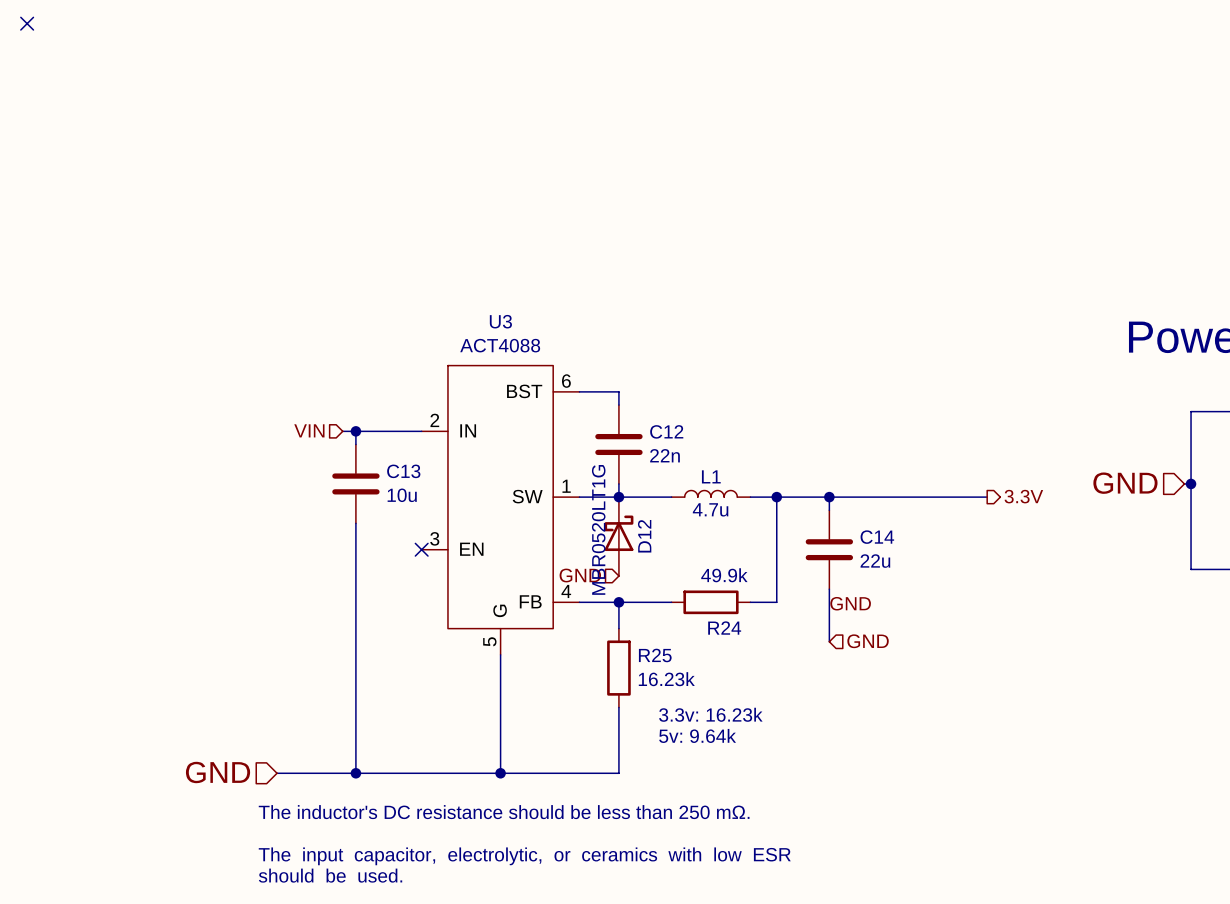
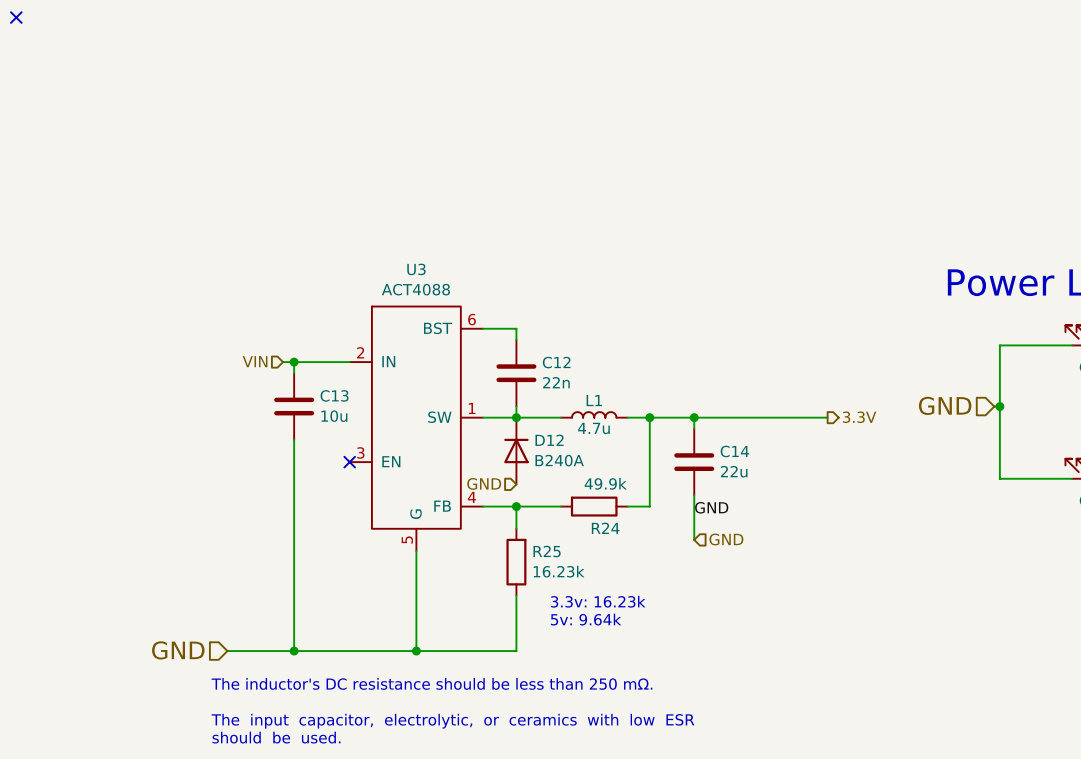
D12 symbol: [604, 497, 634, 577] -> [504, 417, 529, 485]
D12 value: MBR0520LT1G (598, 529) -> B240A (559, 460)
D12 name rotation: 0° (644, 536) -> 90° clockwise (549, 440)

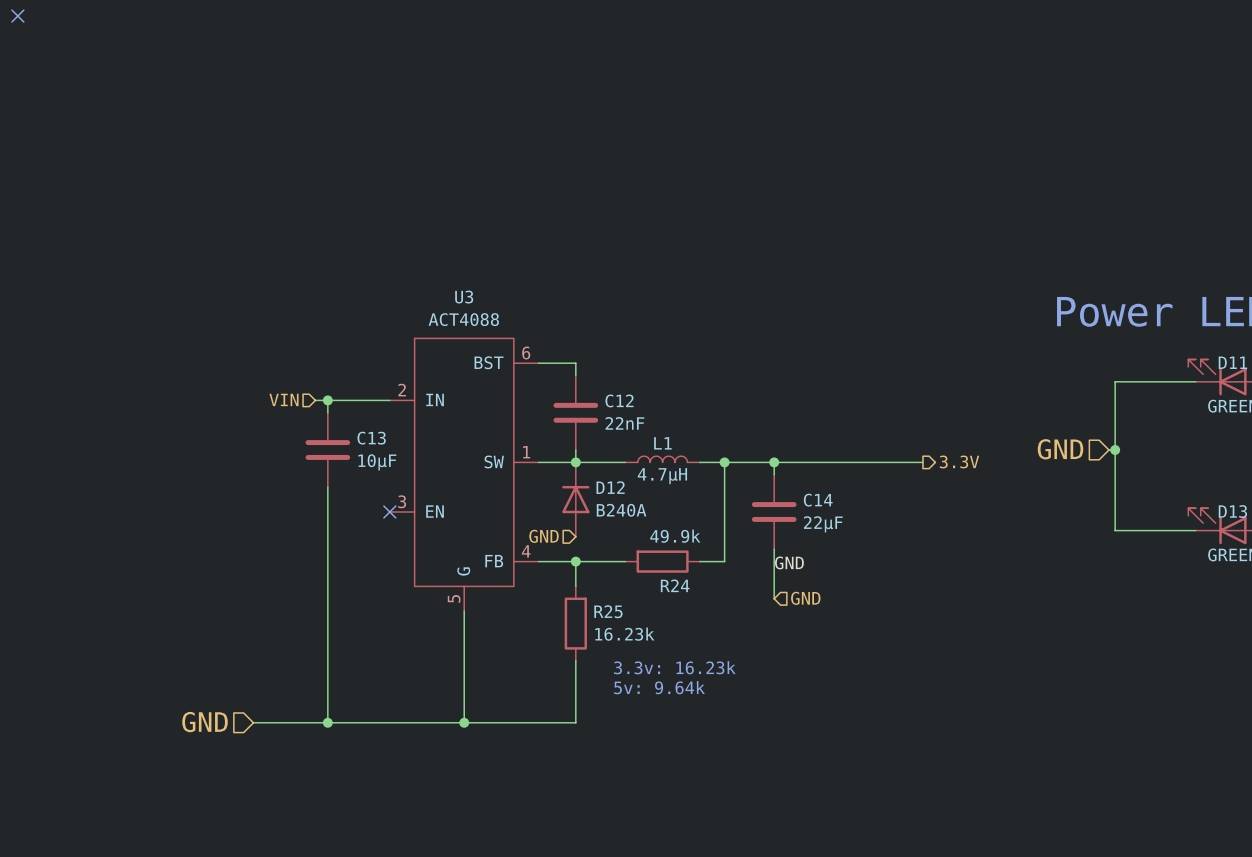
C12 value: 22n (556, 382) -> 22nF (624, 423)
C13 value: 10u (334, 416) -> 10µF (377, 462)
L1 value: 4.7u (593, 428) -> 4.7µH (662, 476)
C14 value: 22u (734, 471) -> 22µF (823, 524)
text: The inductor's DC resistance should be less than 250 mΩ. (431, 683) -> none
text: The input capacitor, electrolytic, or ceramics with low ESR (453, 721) -> none
text: should be used. (276, 737) -> none

